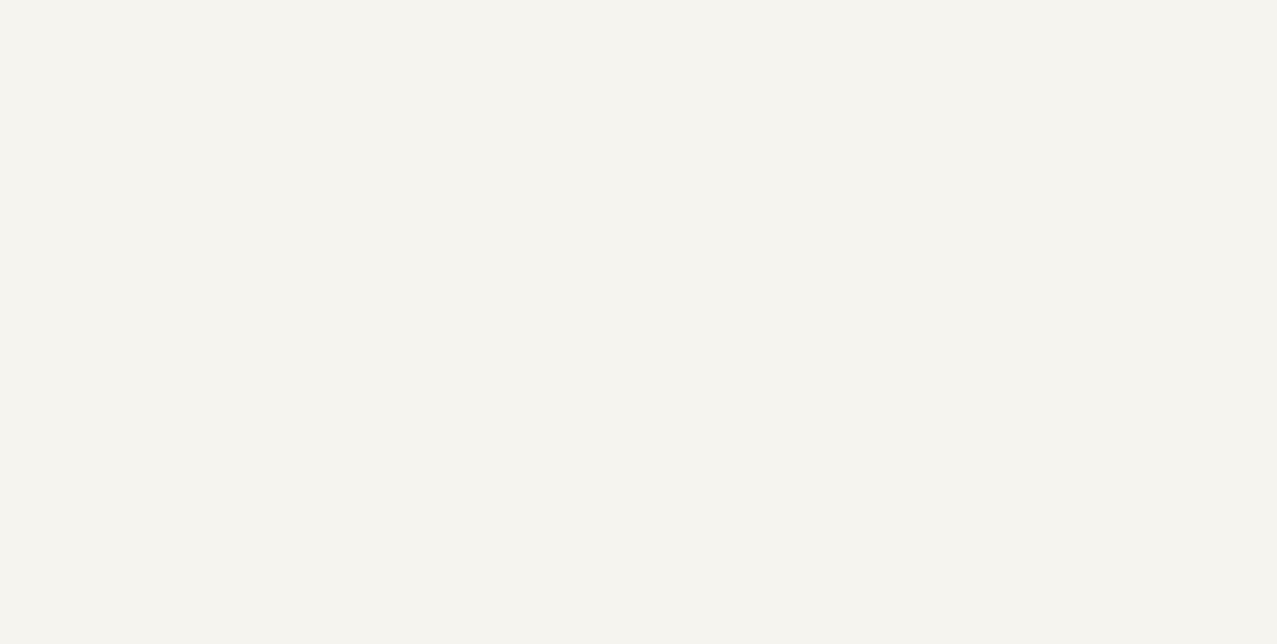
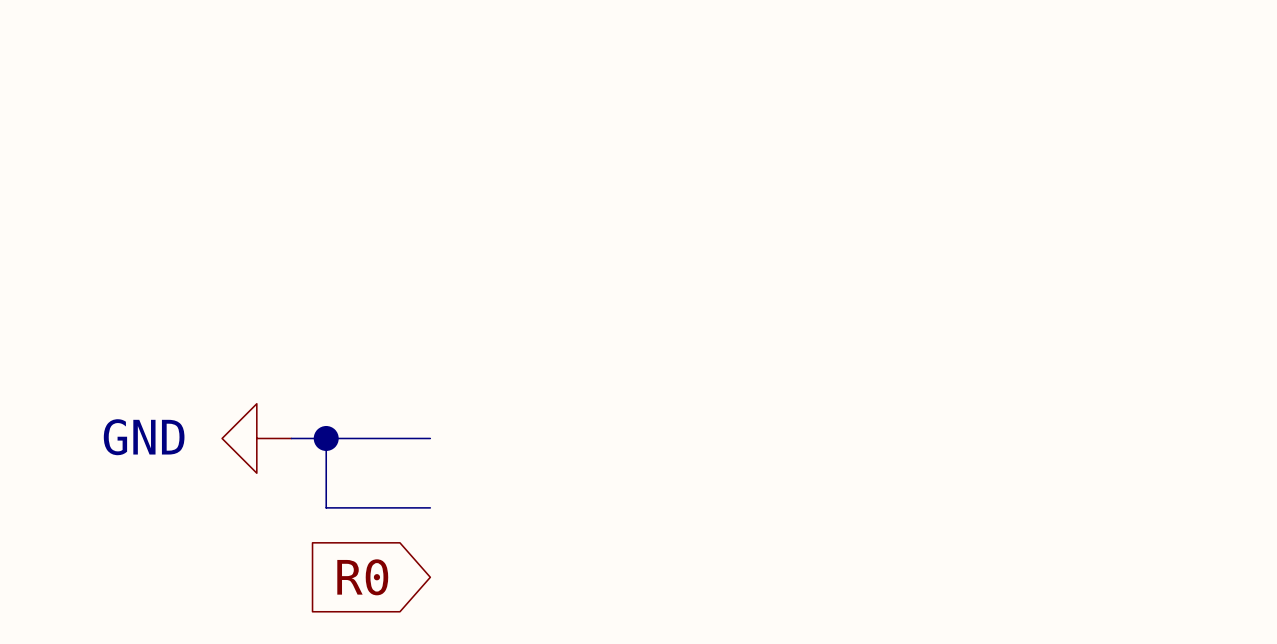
power symbol: none -> GND (256, 438)
wire: none -> (291, 438) (430, 438)
wire: none -> (326, 438) (326, 507) (430, 507)
junction: none -> (326, 438)
global label: none -> R0 (362, 577)

